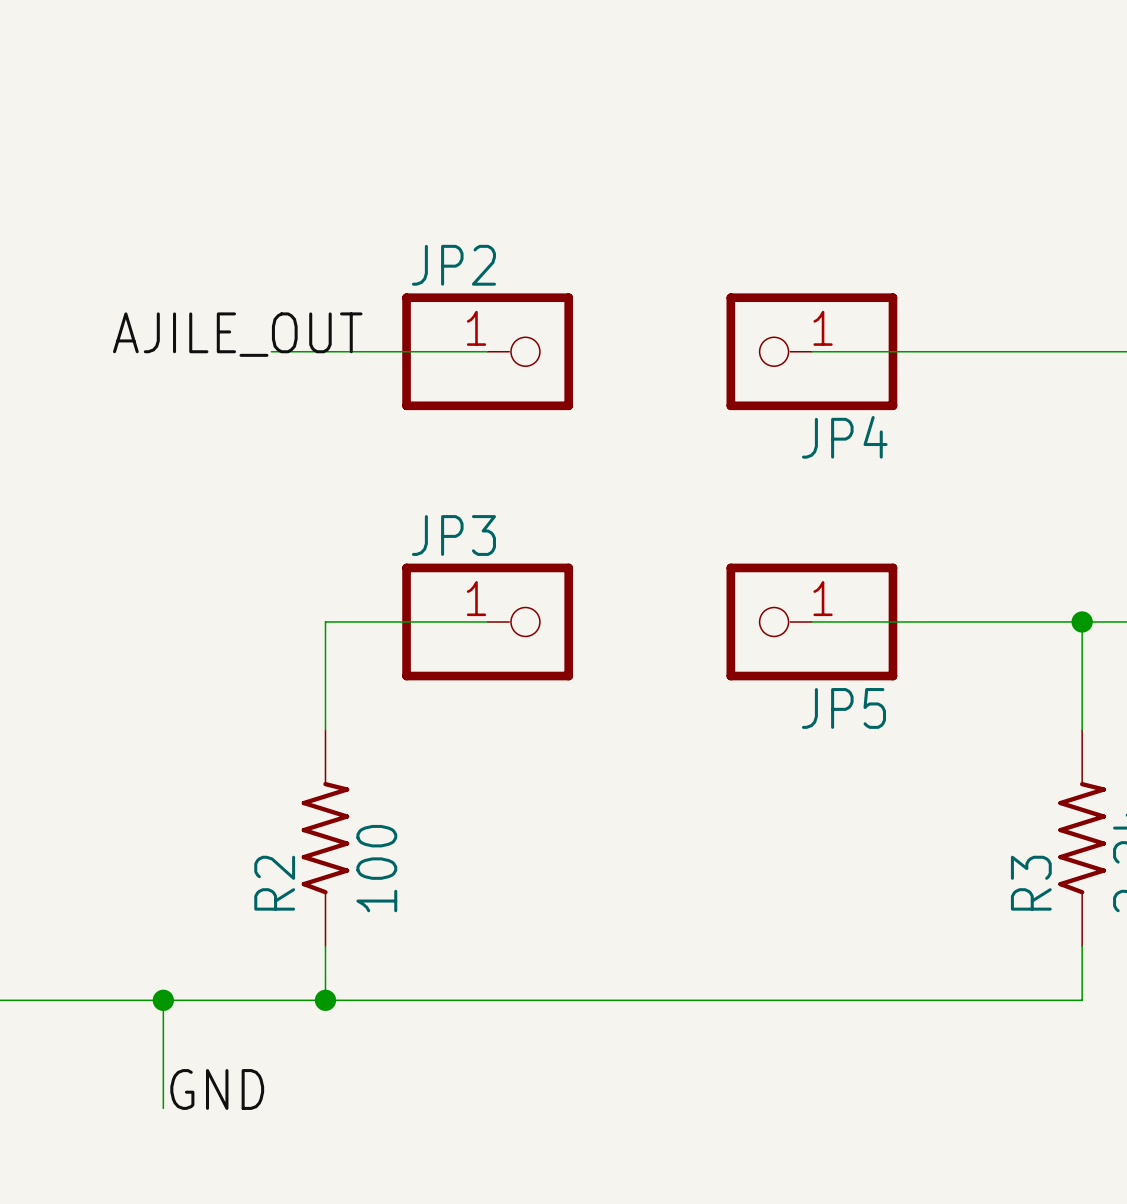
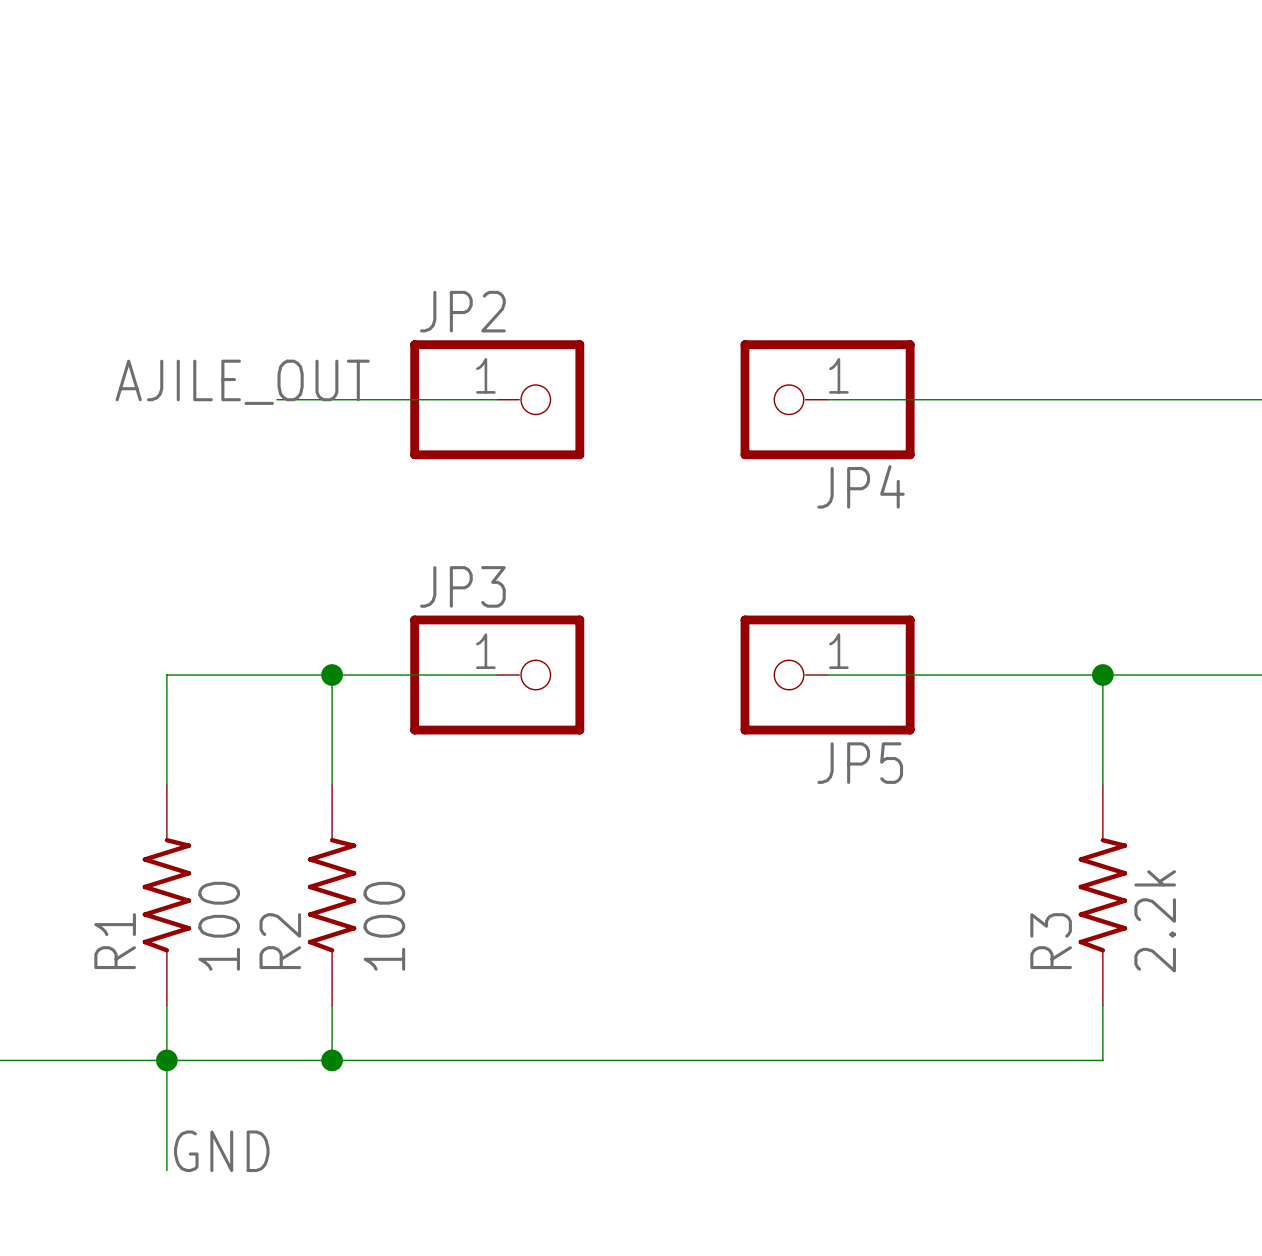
wire: none -> (332, 675) (166, 675) (166, 785)
junction: none -> (332, 675)
R1: none -> 100 (166, 895)
wire: none -> (166, 1005) (166, 1060)

